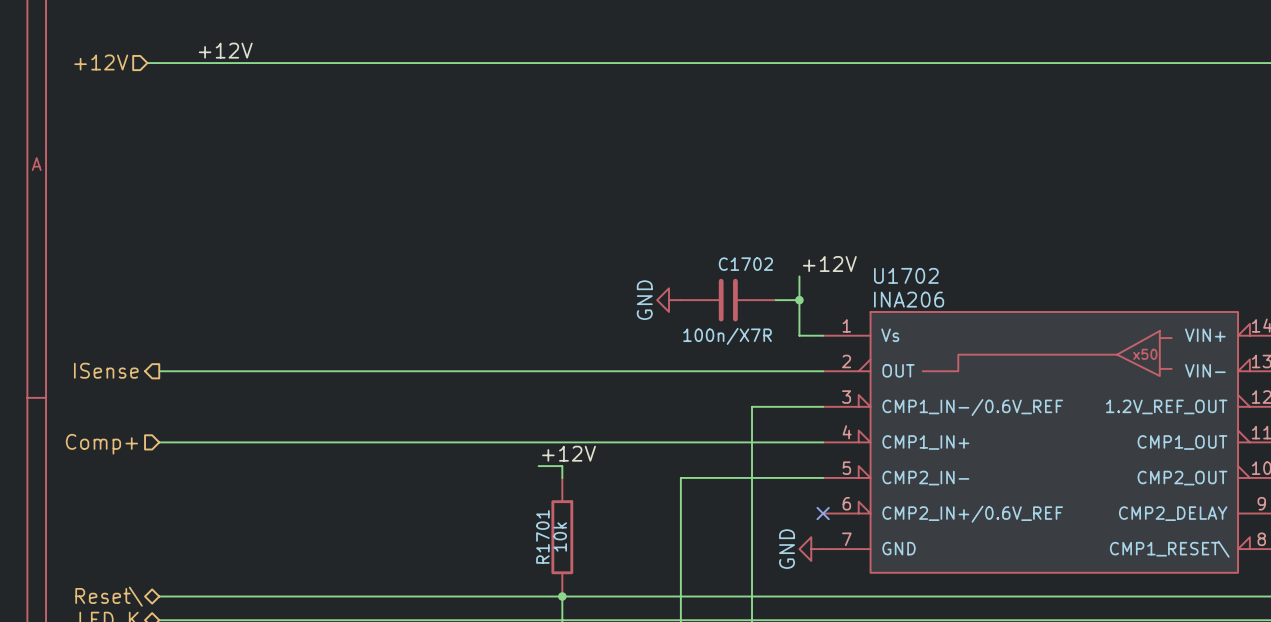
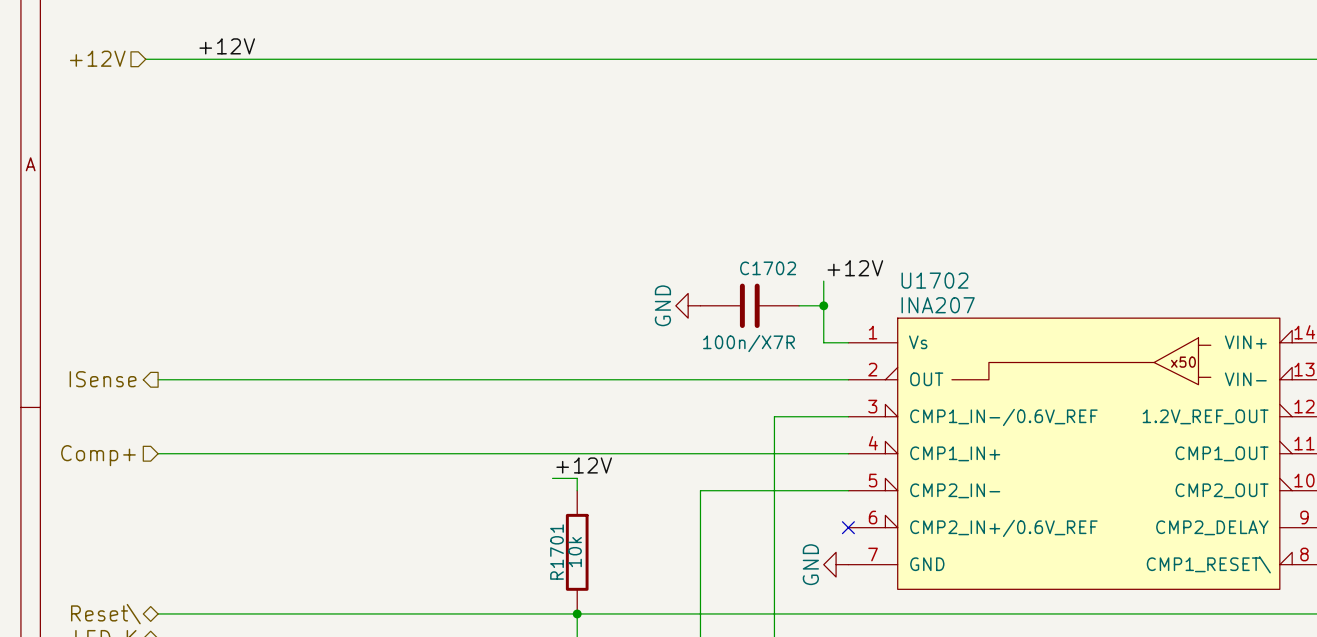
U1702 value: INA206 (909, 299) -> INA207 (938, 305)

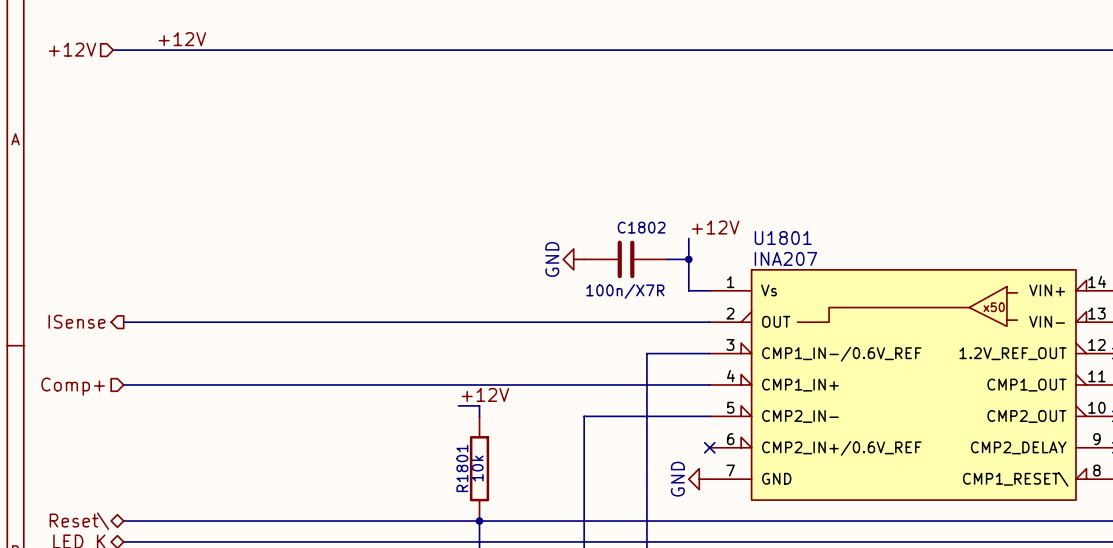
C1702 name: C1702 (768, 268) -> C1802 (641, 227)
U1702 name: U1702 (934, 280) -> U1801 (783, 238)
R1701 name: R1701 (557, 552) -> R1801 (462, 468)

